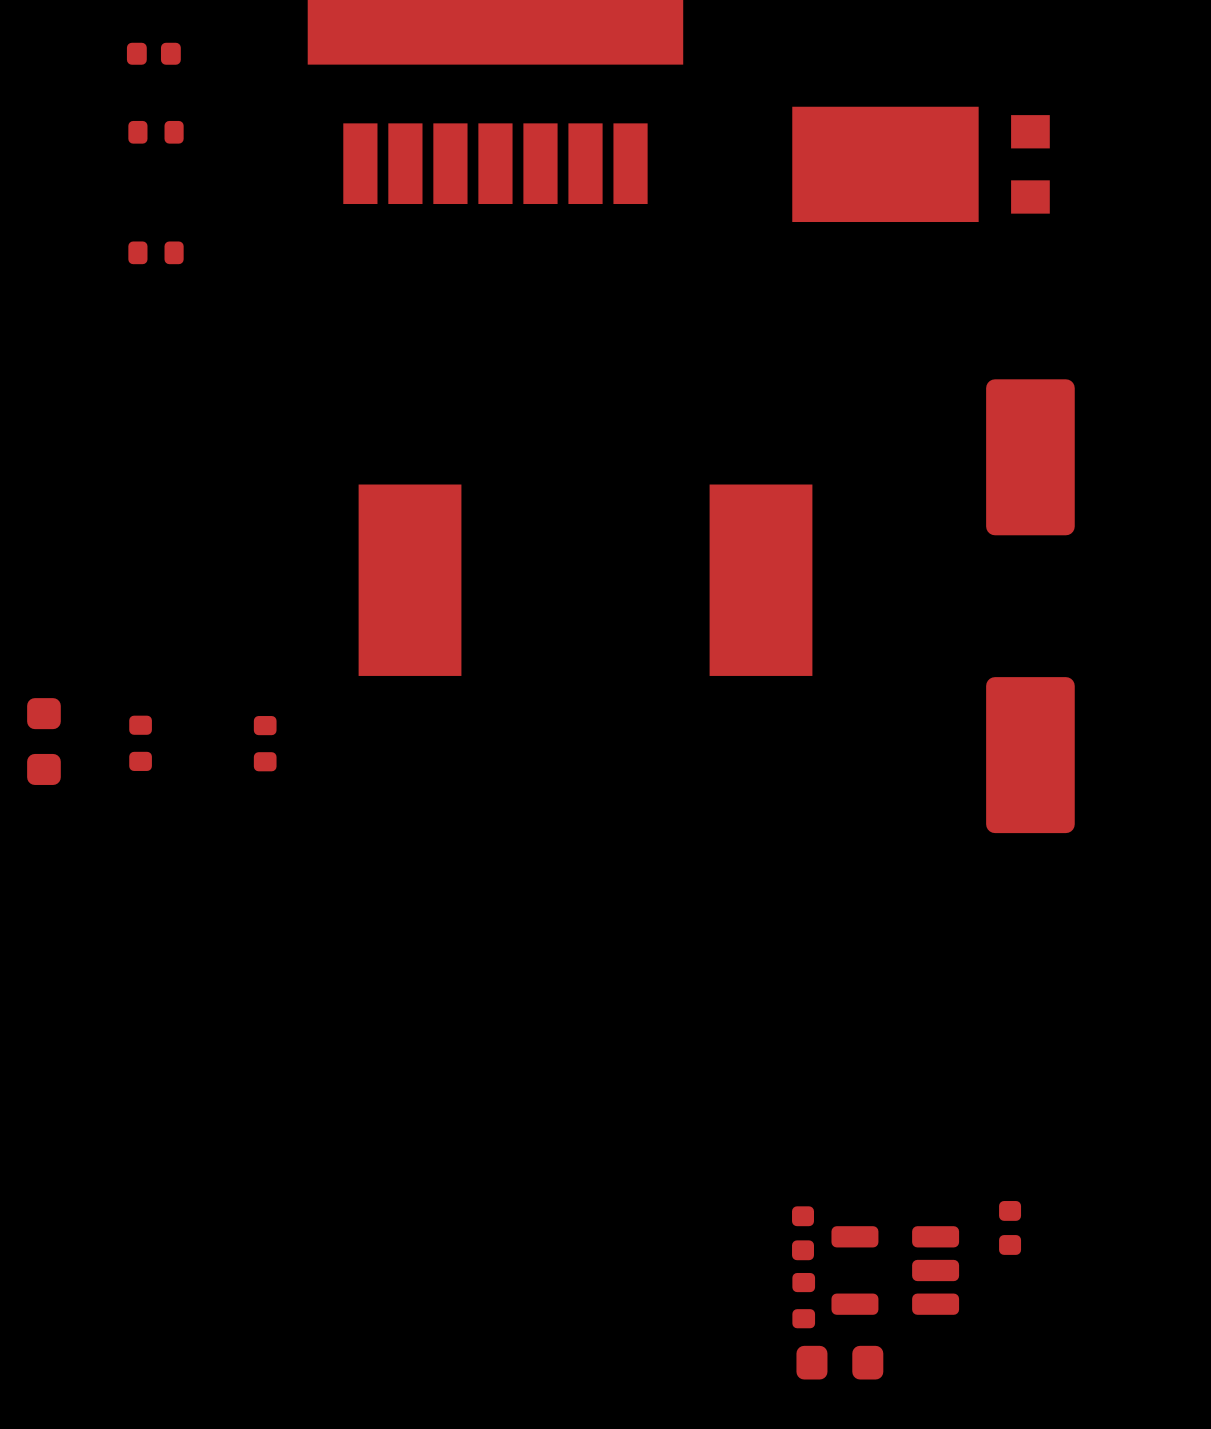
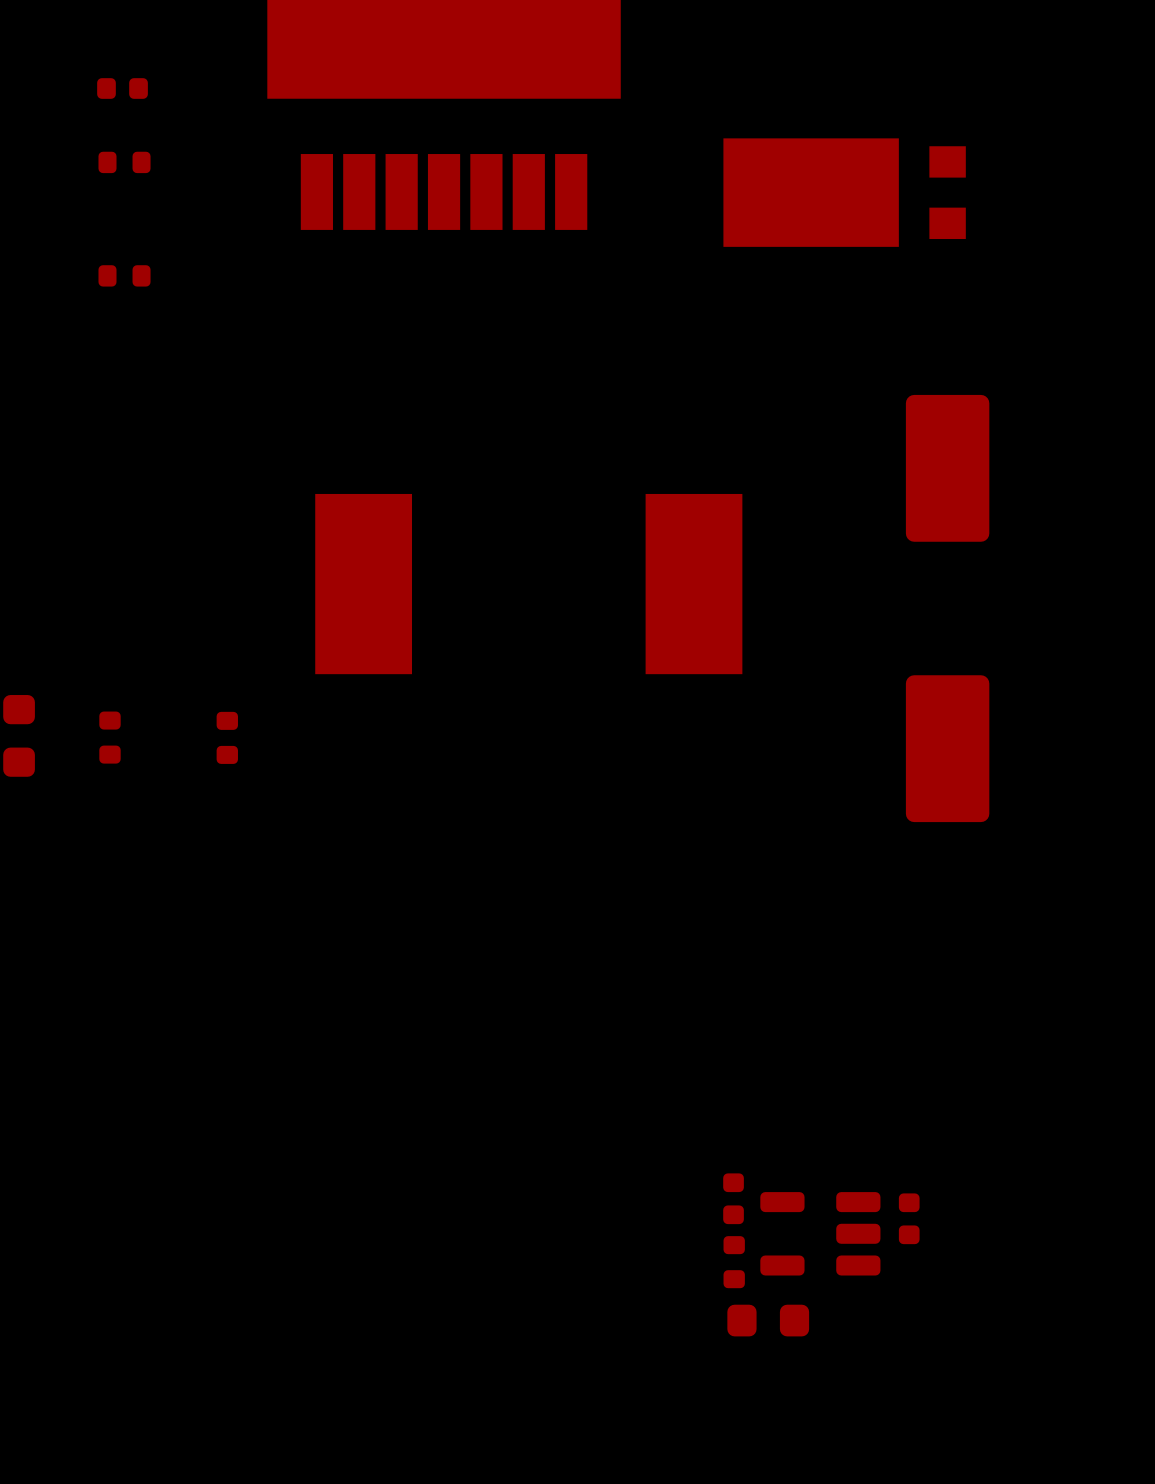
part position: (1010, 1227) -> (909, 1218)

